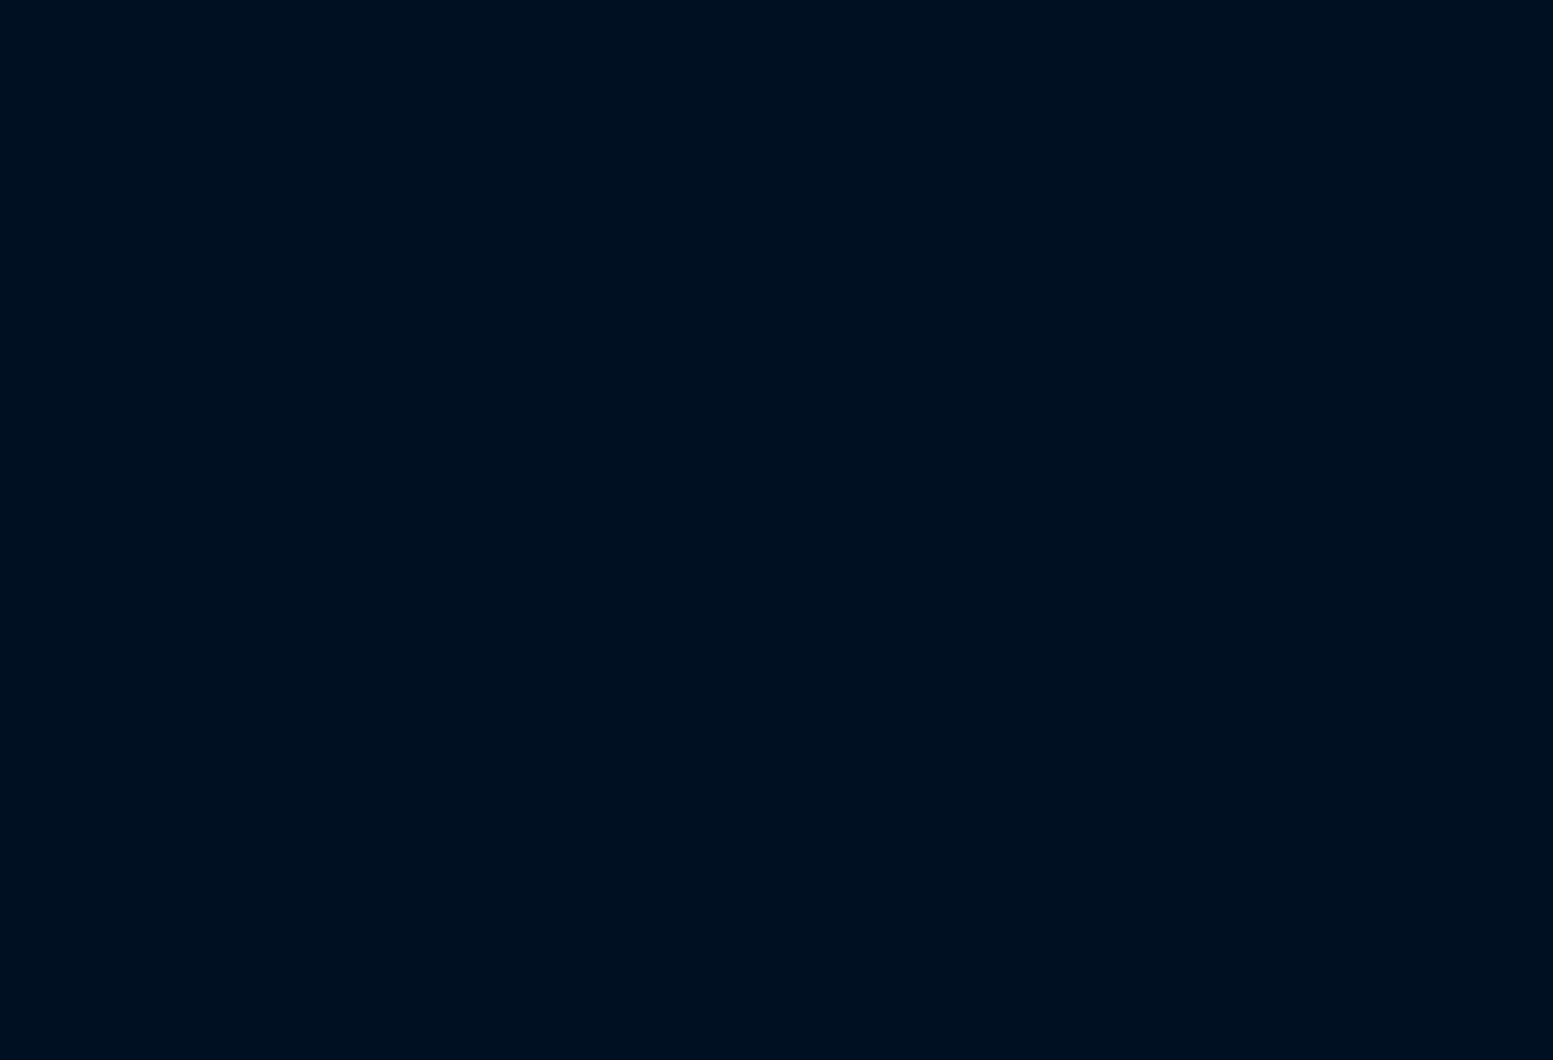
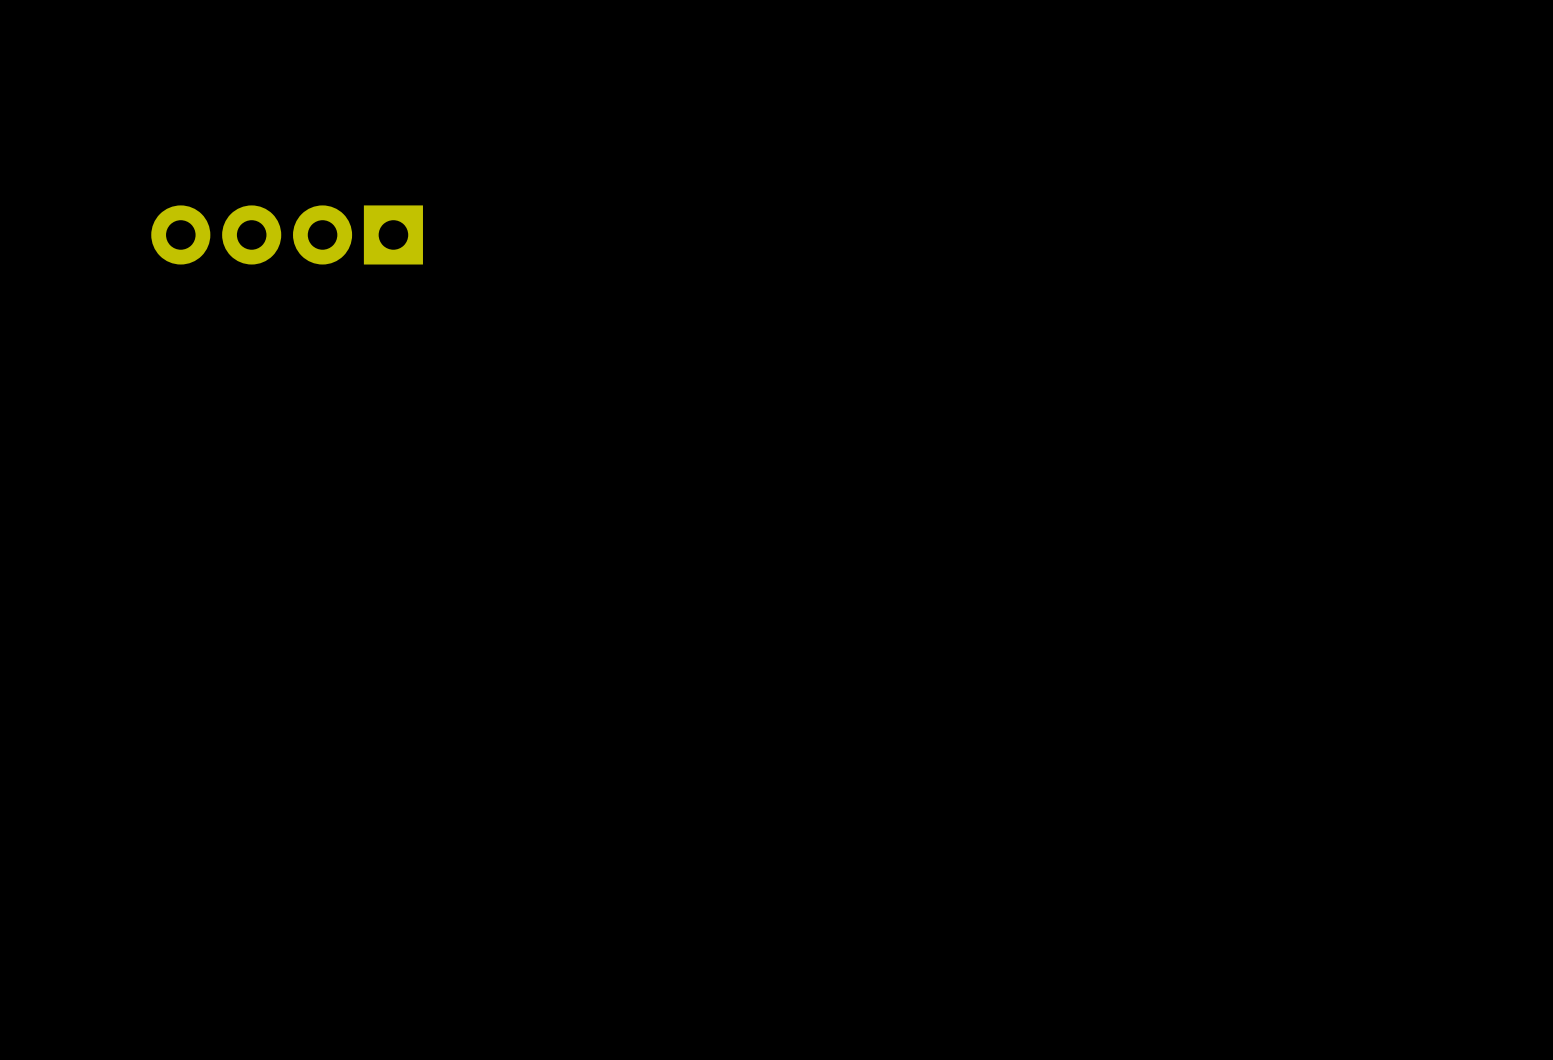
part: none -> (287, 234)

